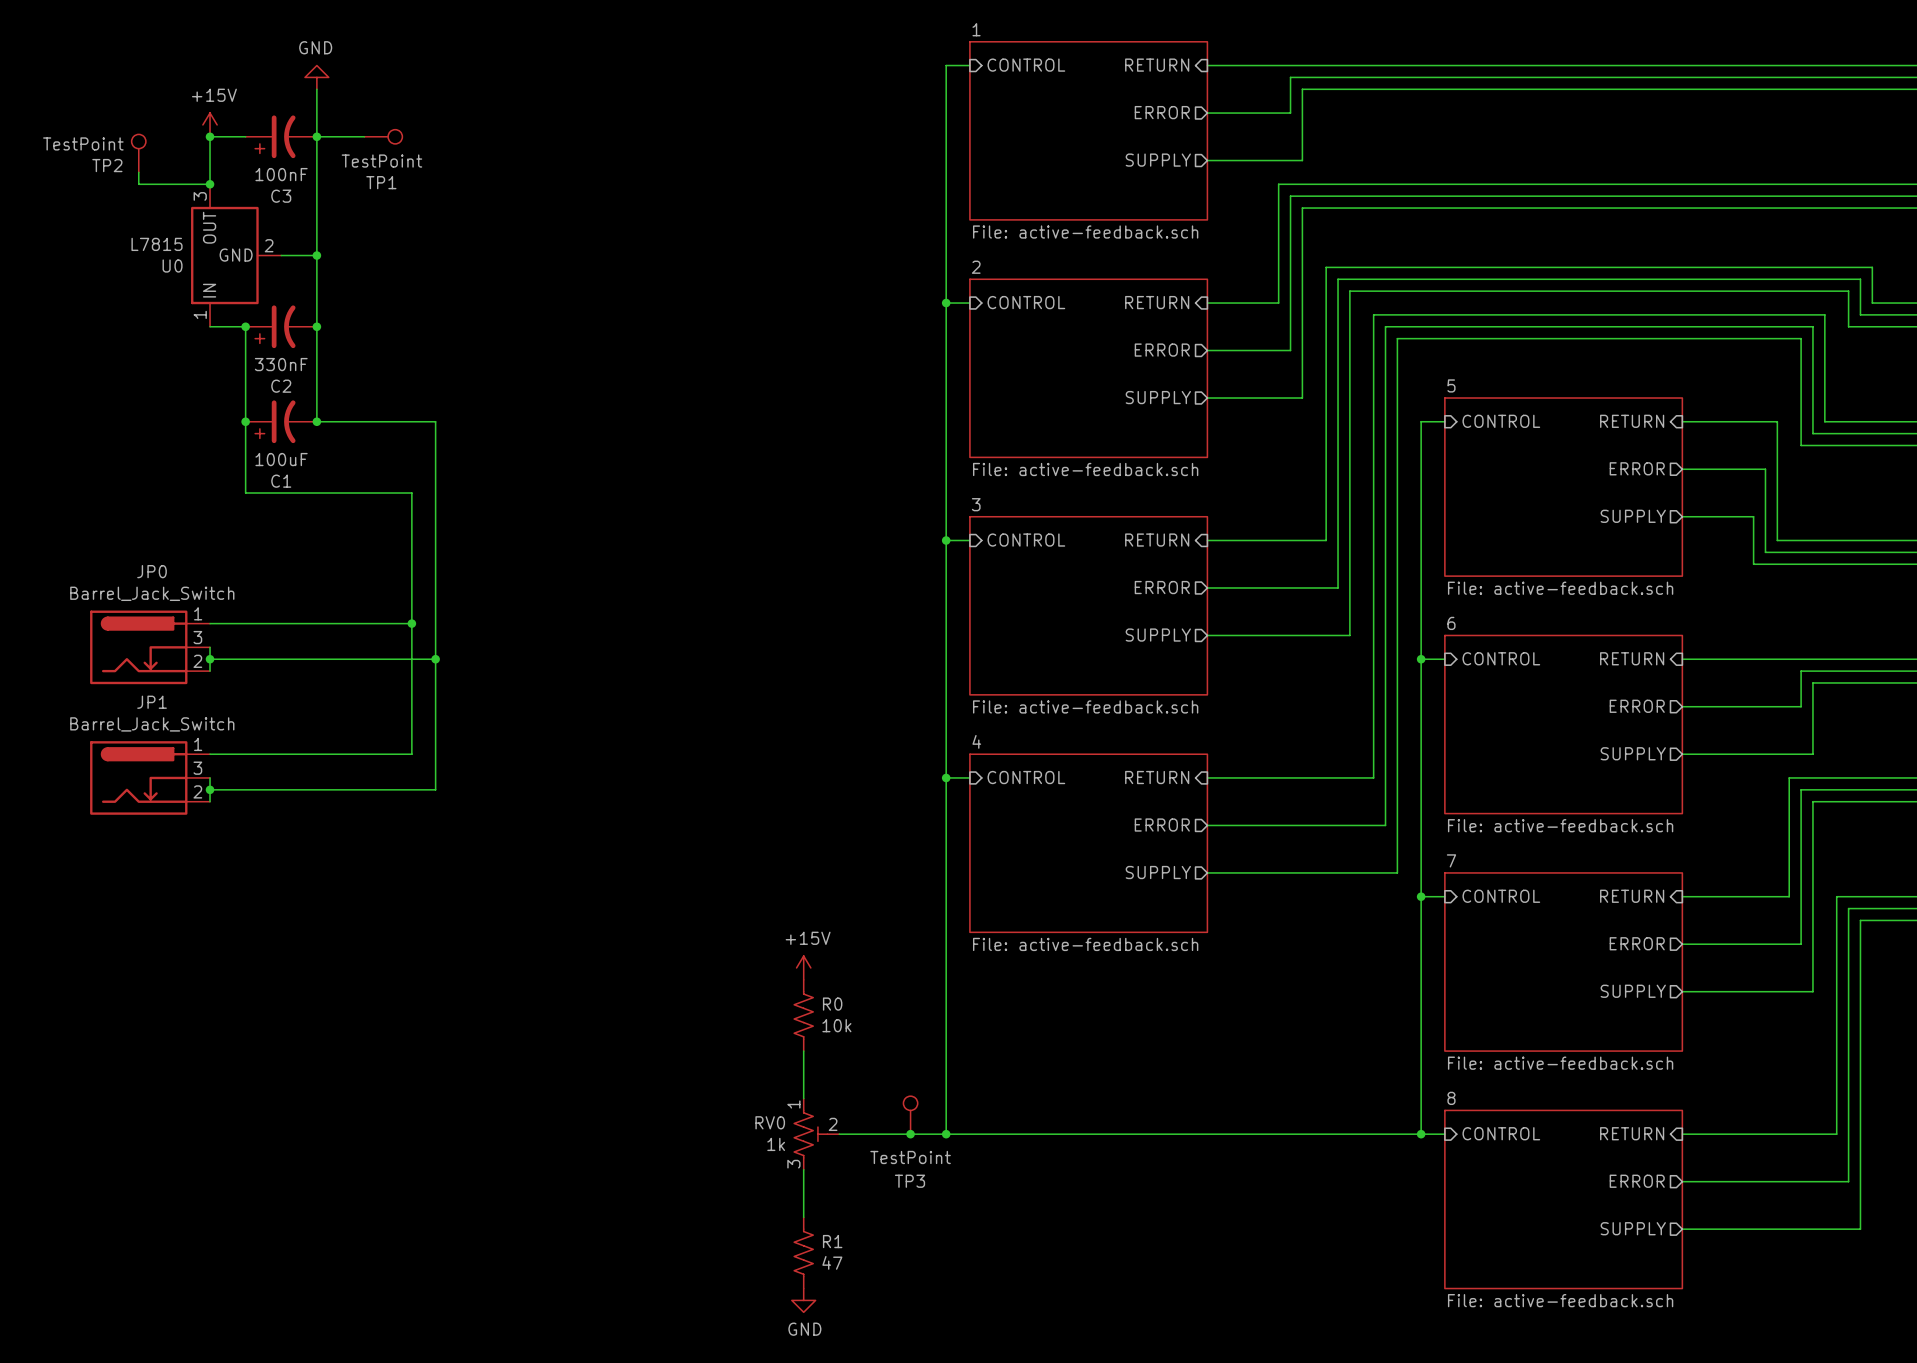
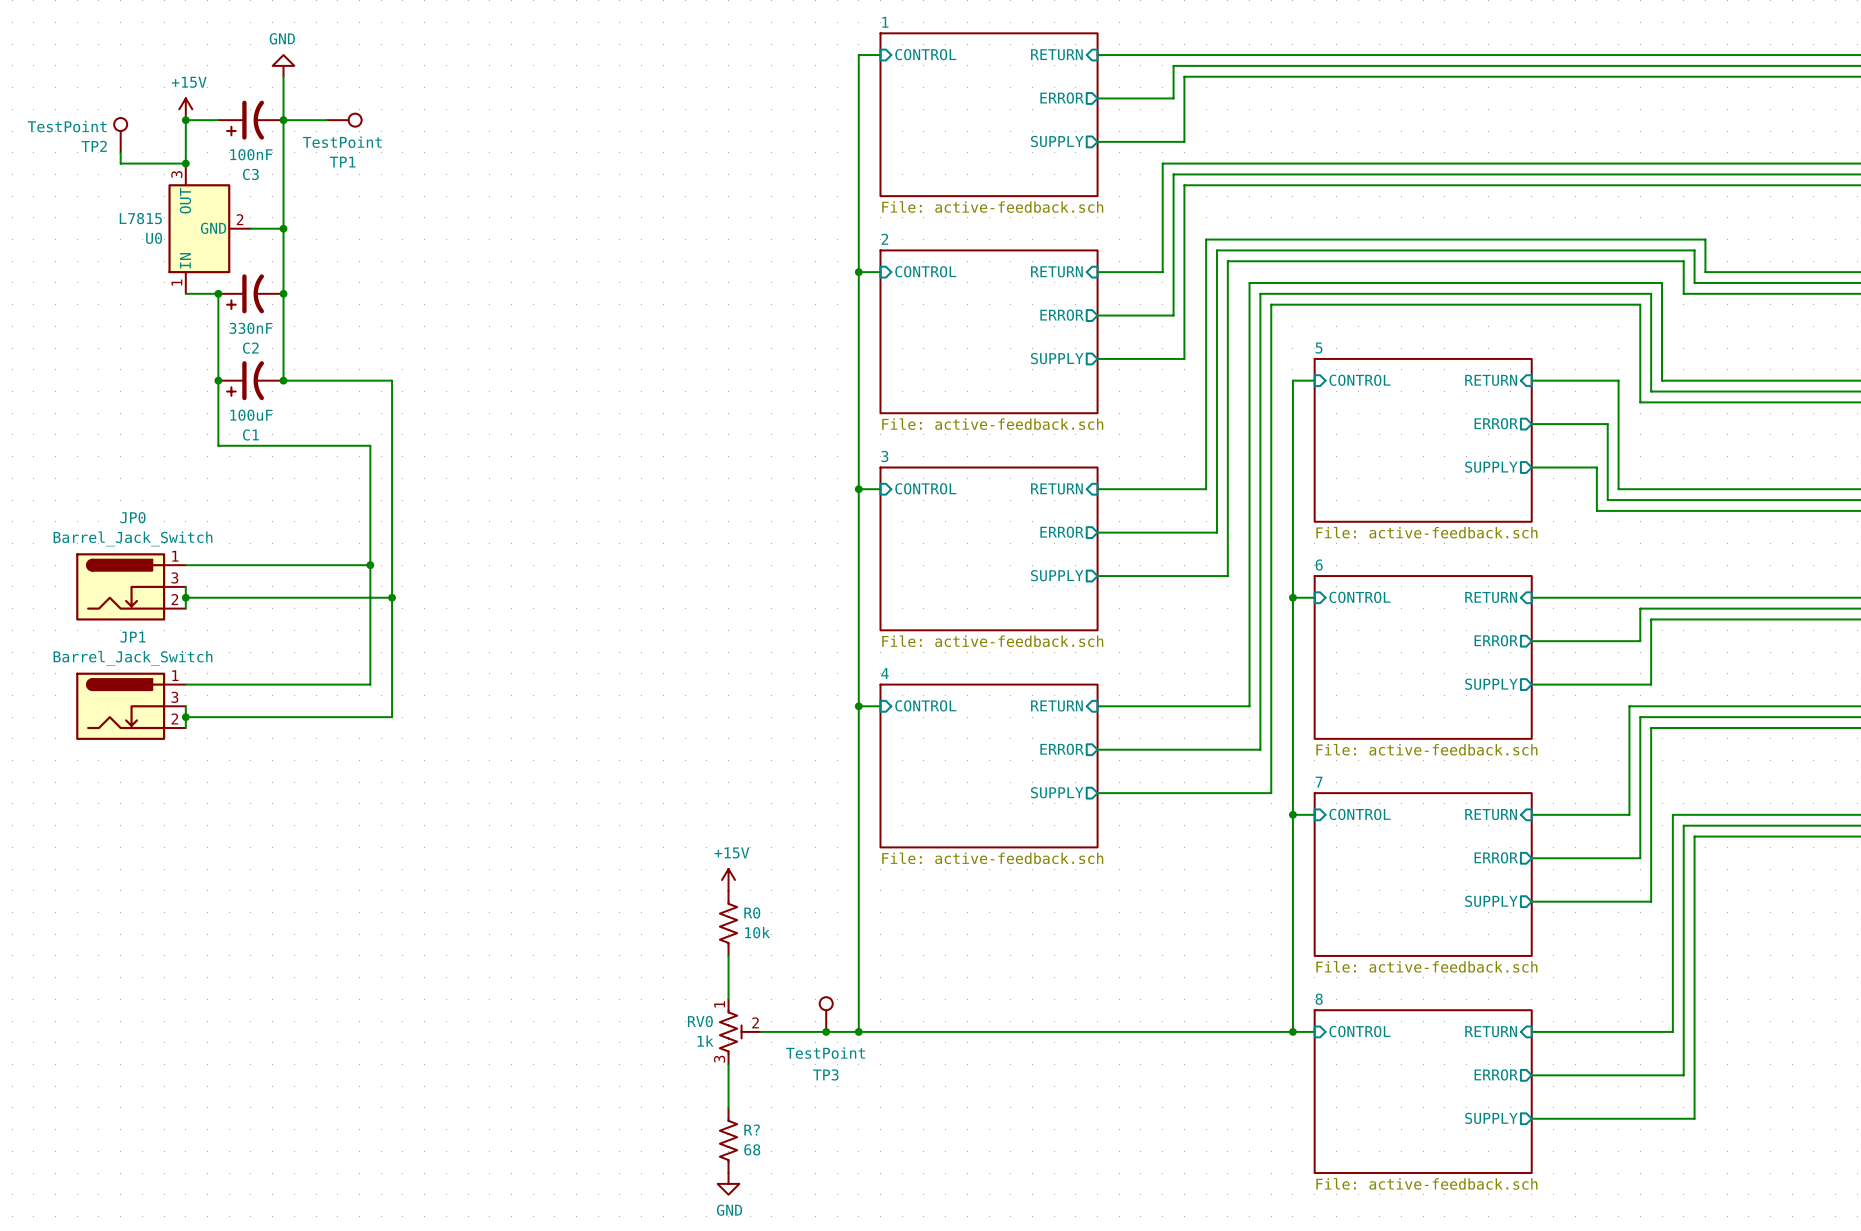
R1 name: R1 (832, 1241) -> R? (752, 1129)
R1 value: 47 (832, 1262) -> 68 (752, 1149)

